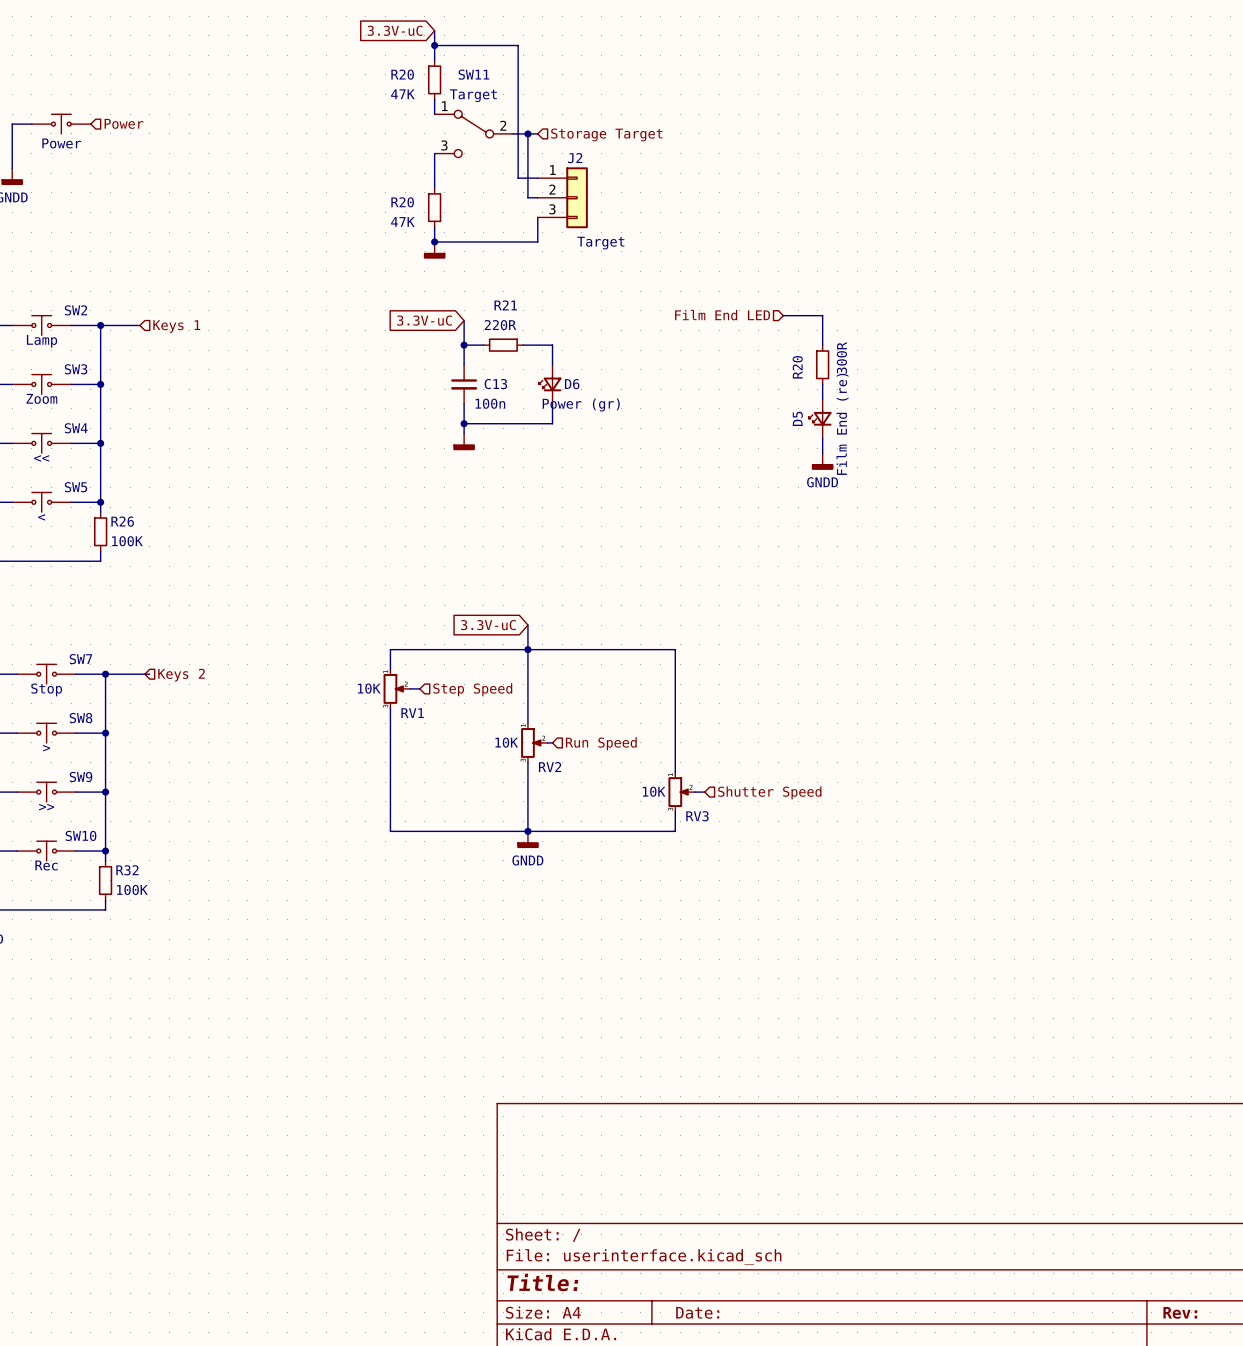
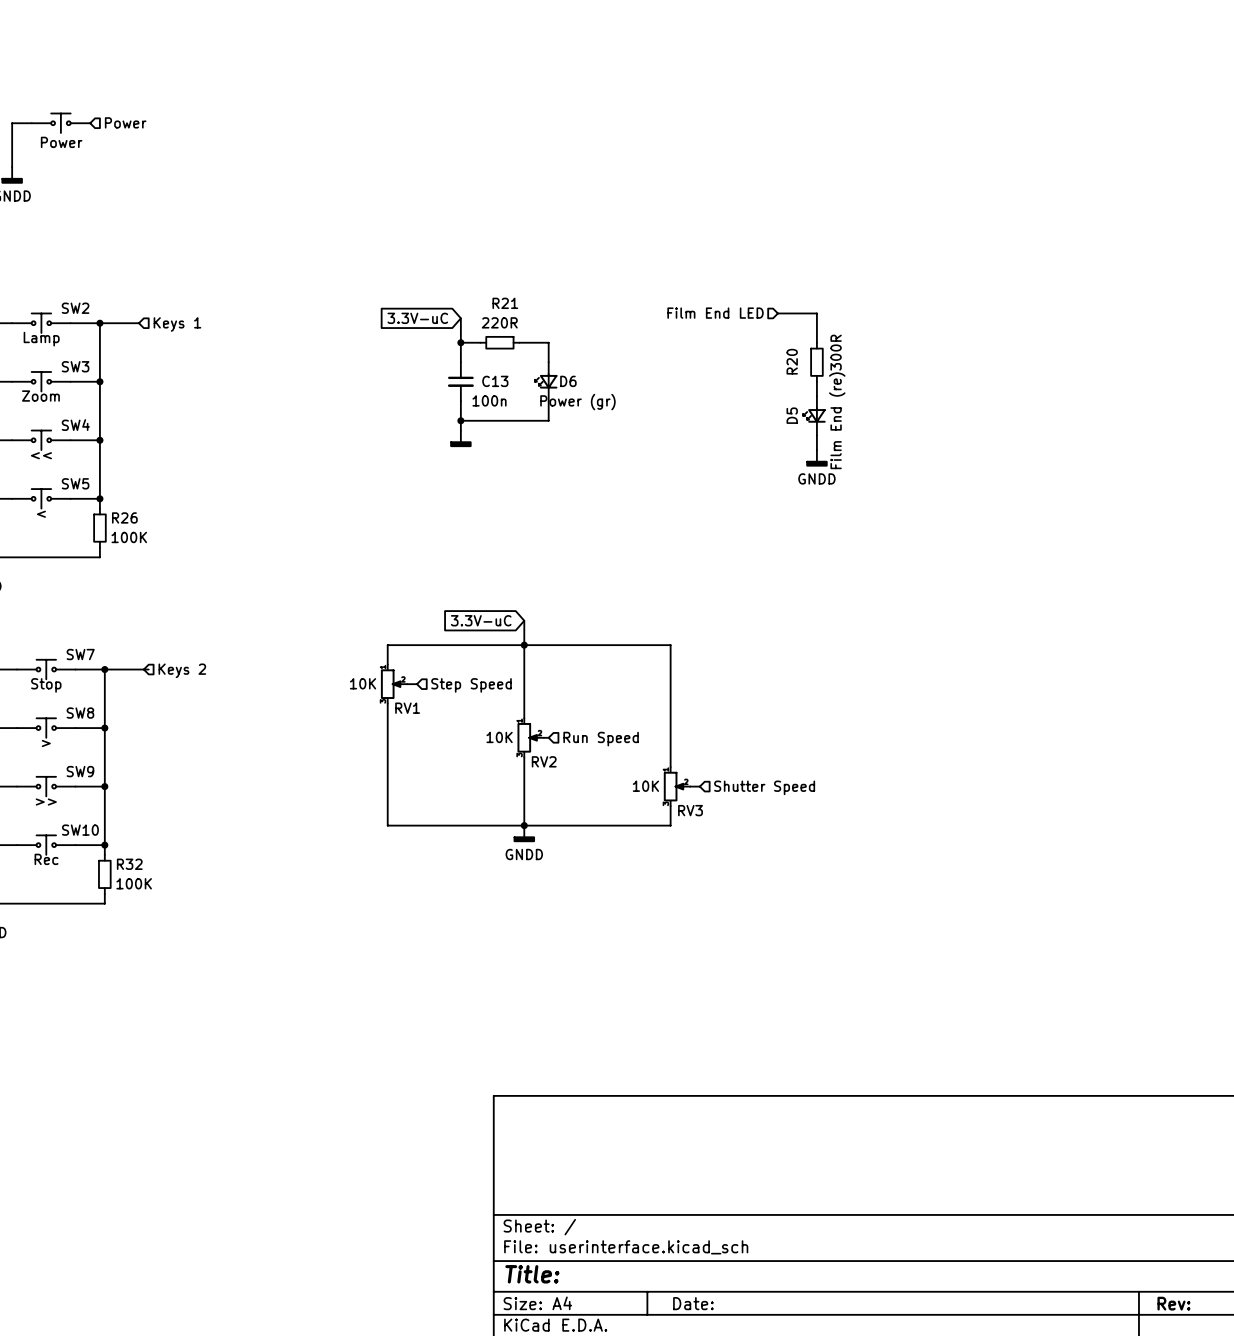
global label: 3.3V-uC (395, 30) -> none
wire: (434, 30) (434, 60) -> none
wire: (434, 45) (518, 45) (518, 178) (537, 178) -> none
junction: (434, 45) -> none
R20: 47K (434, 79) -> none
wire: (434, 99) (434, 114) -> none
SW11: Target (473, 133) -> none
wire: (513, 133) (537, 133) -> none
wire: (527, 133) (527, 197) (537, 197) -> none
junction: (527, 133) -> none
hierarchical label: Storage Target (606, 134) -> none
wire: (434, 153) (434, 187) -> none
J2: Target (562, 197) -> none
R20: 47K (434, 207) -> none
wire: (537, 217) (537, 241) (434, 241) (434, 227) -> none
junction: (434, 241) -> none
power symbol: (434, 250) -> none

